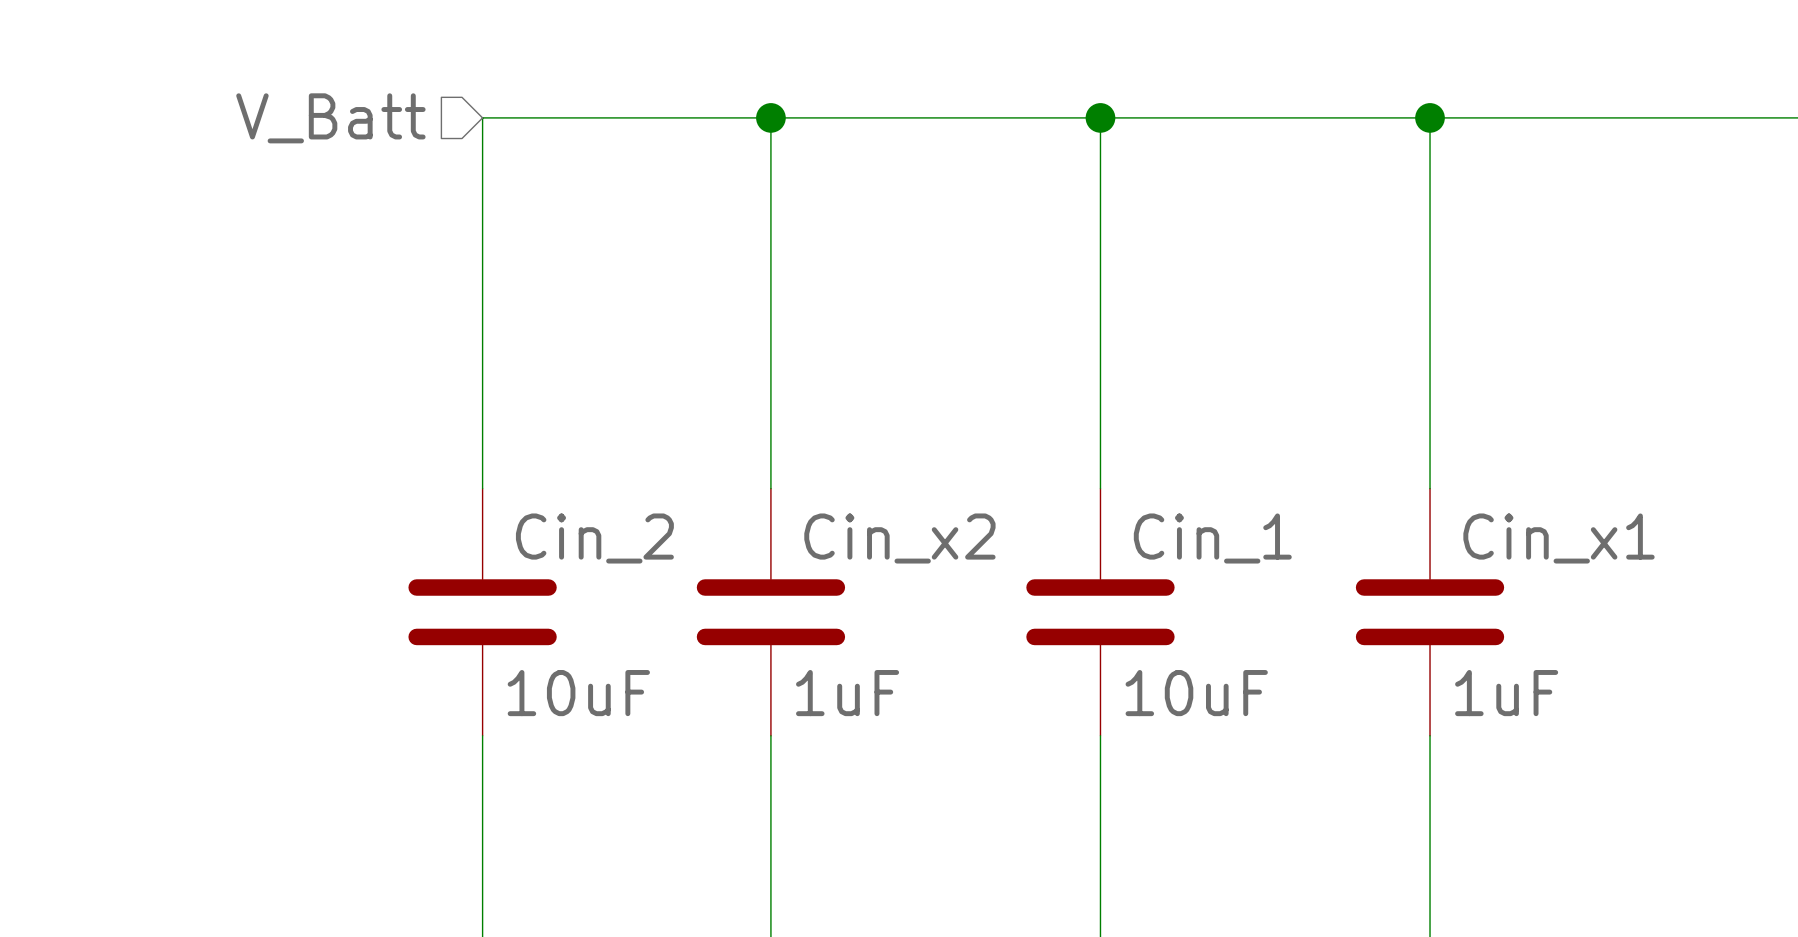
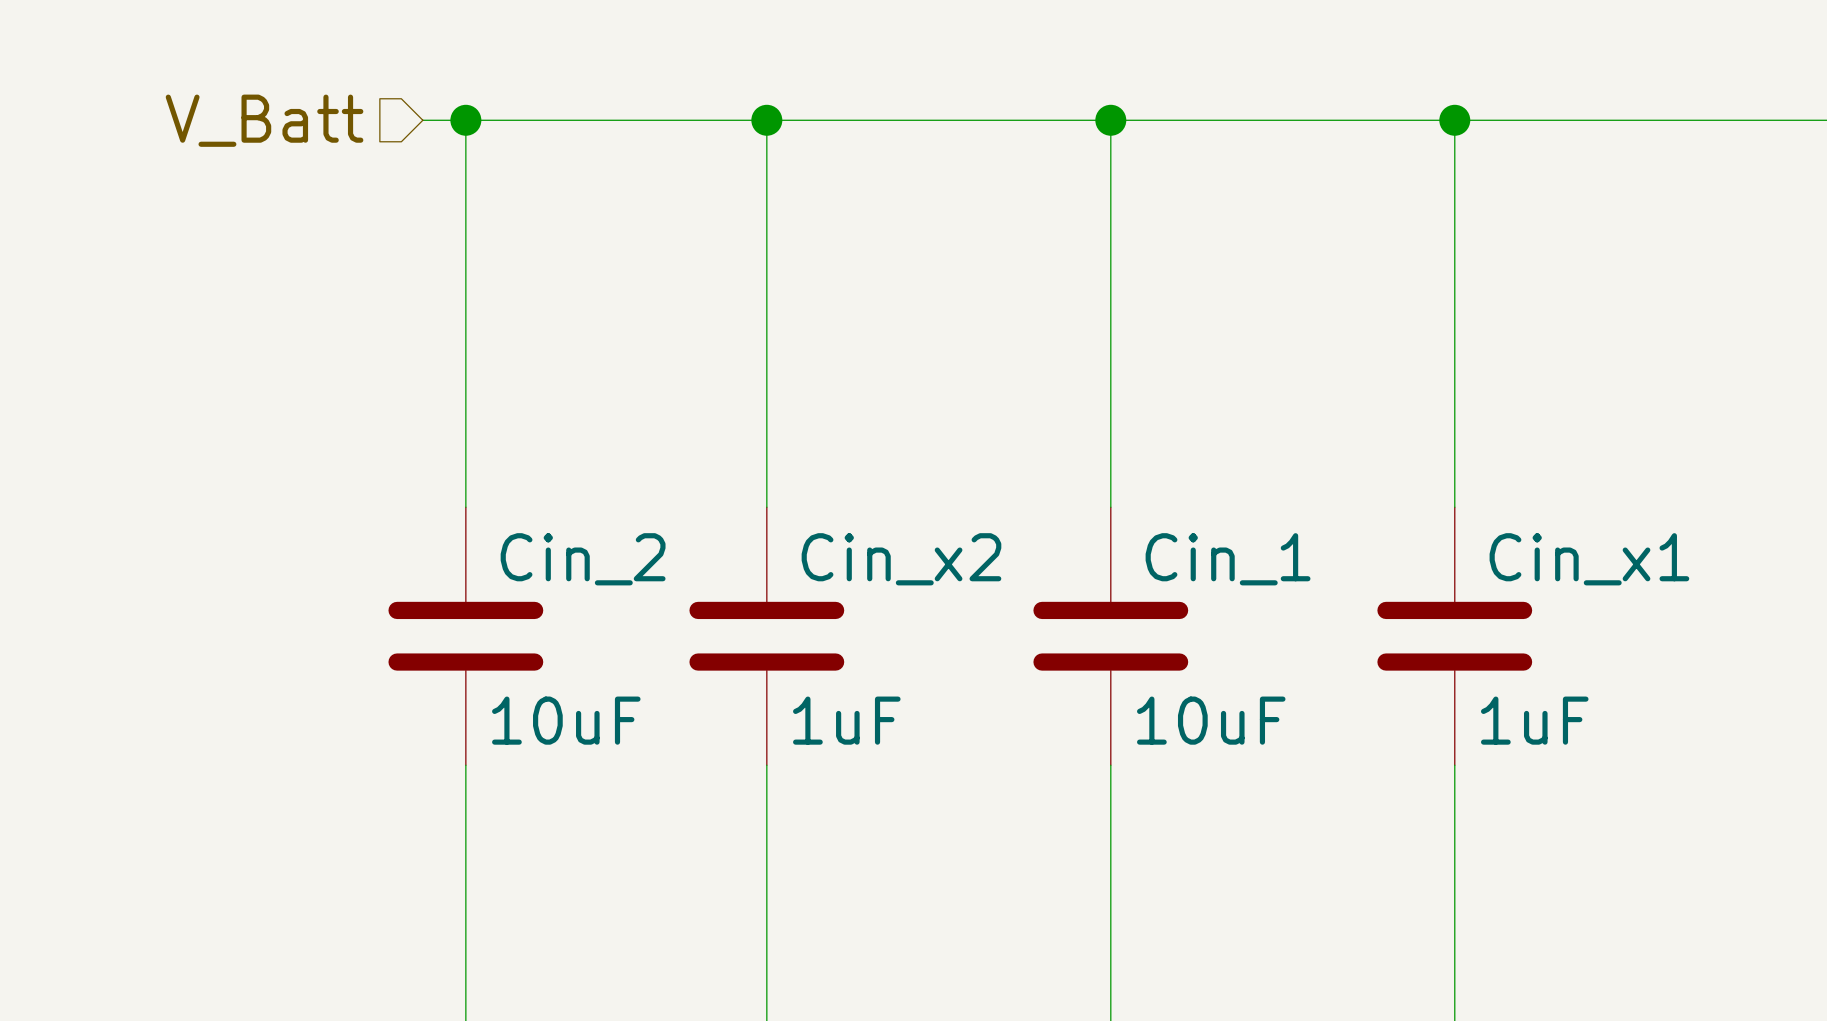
wire: none -> (422, 120) (465, 120)
junction: none -> (465, 120)
hierarchical label position: V_Batt (330, 118) -> V_Batt (264, 120)

